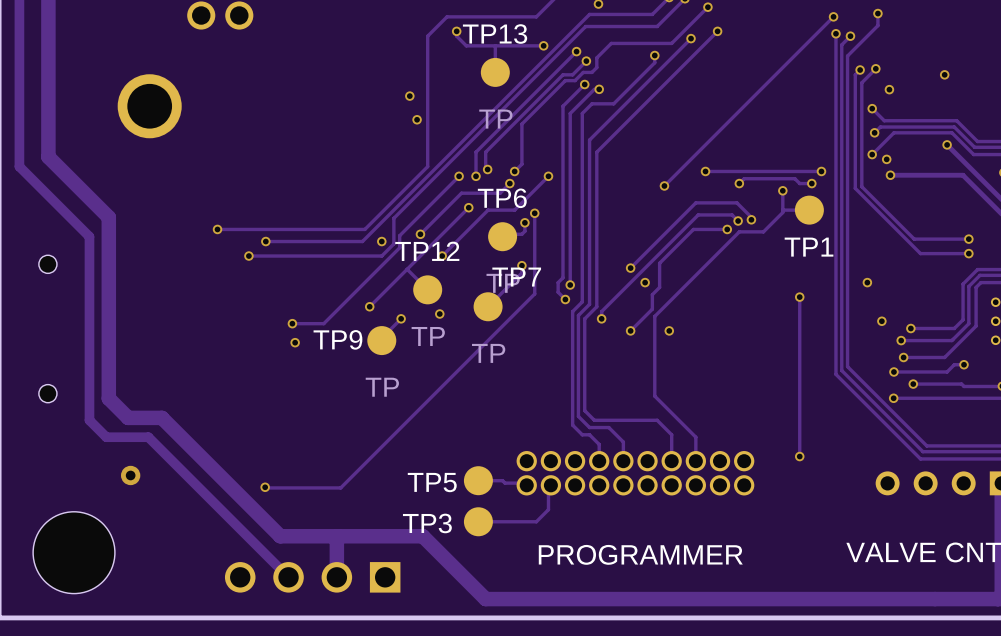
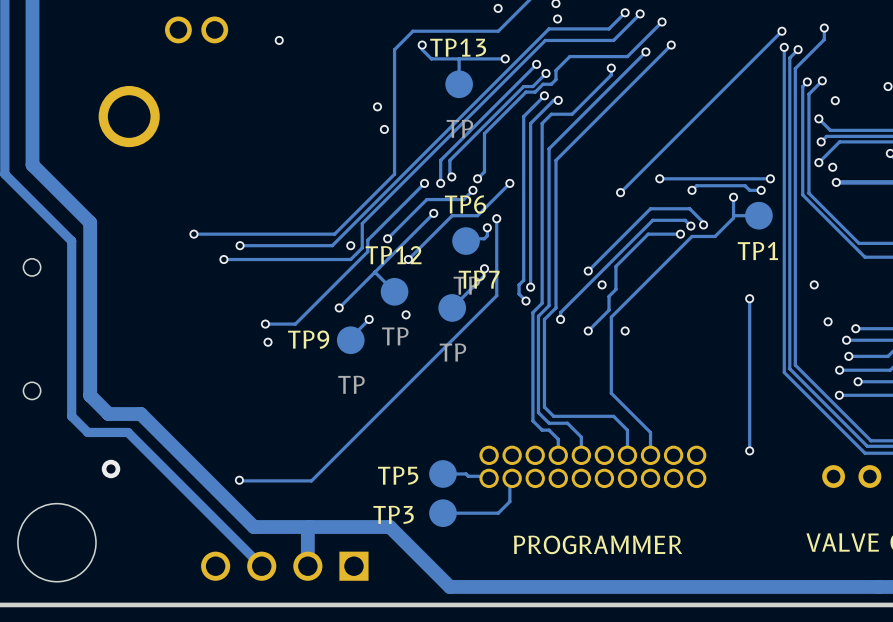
via: none -> (279, 40)

